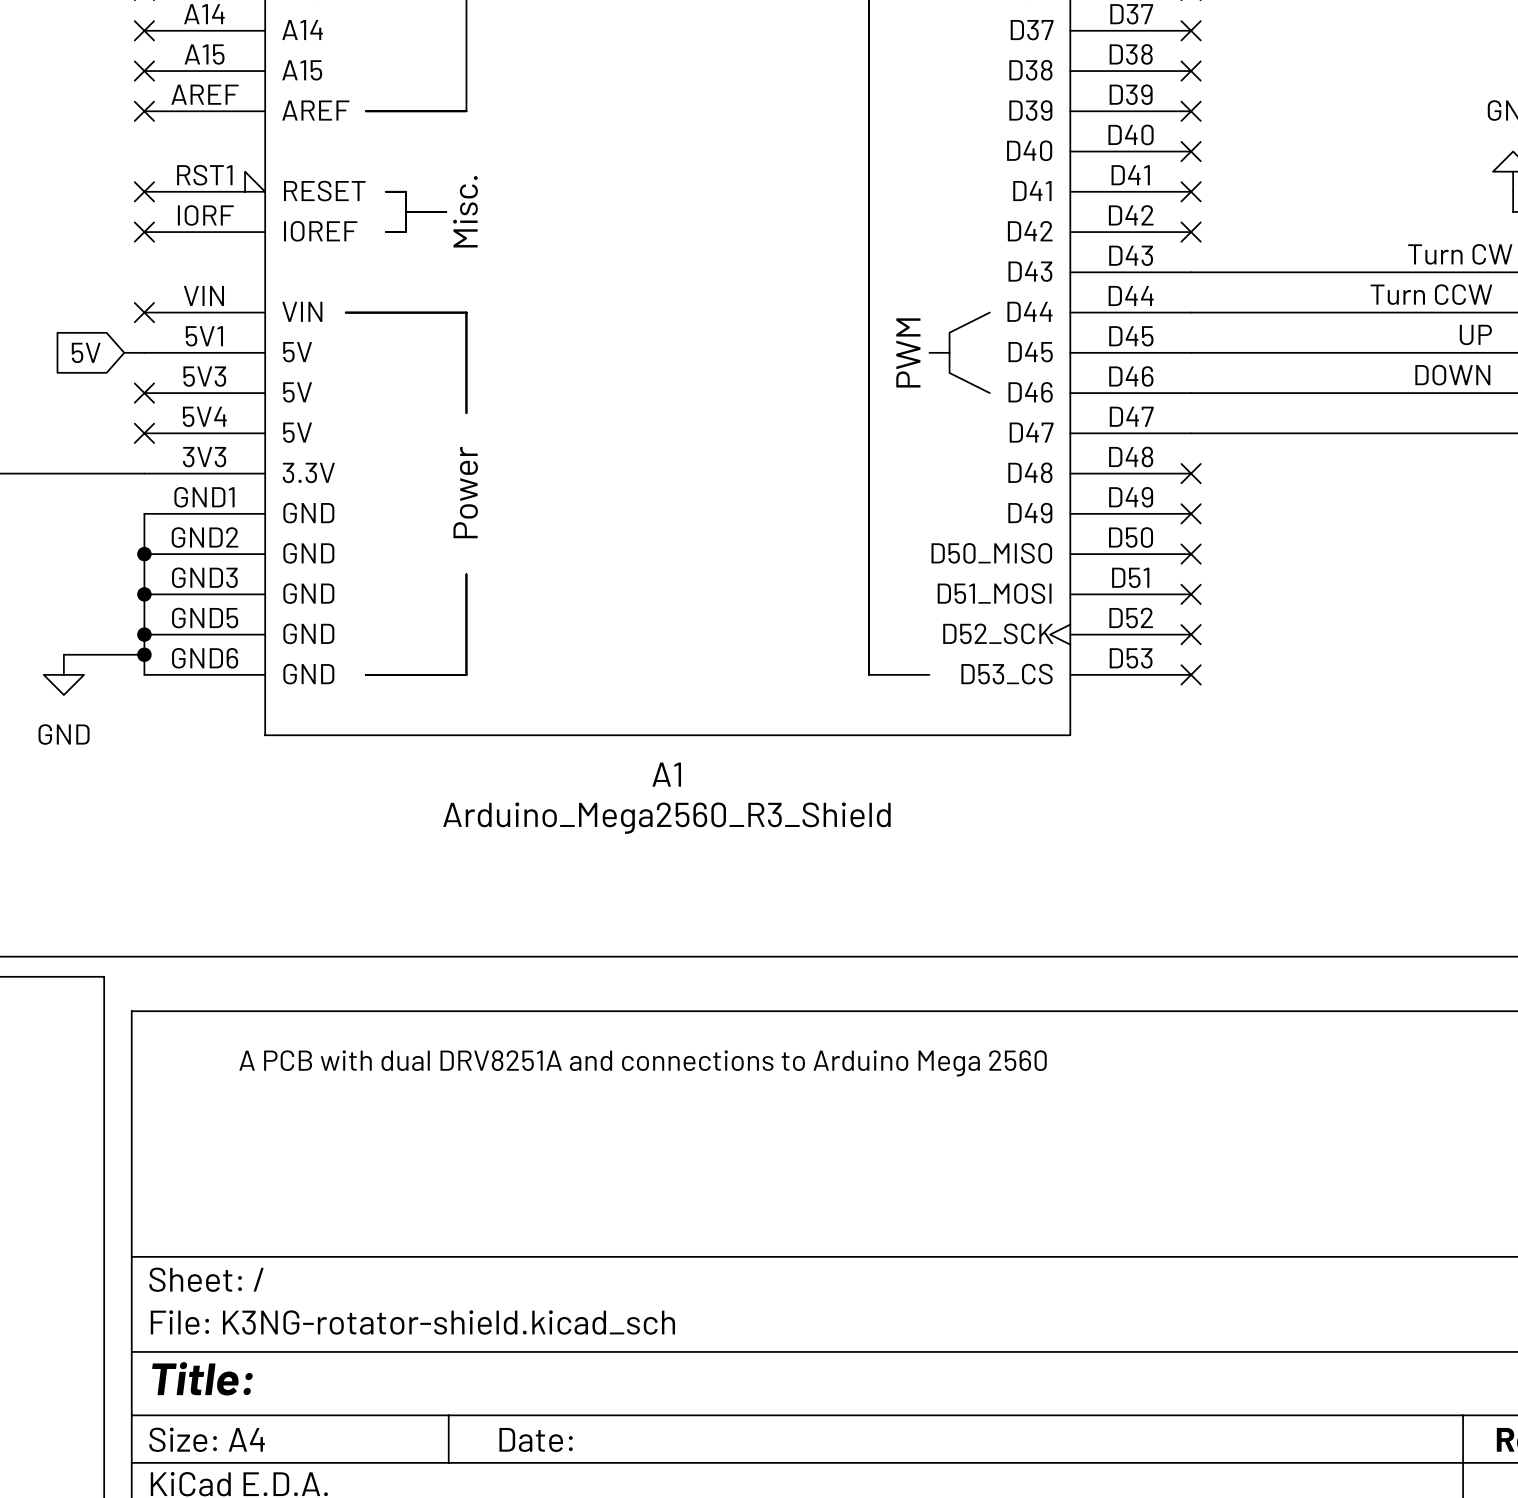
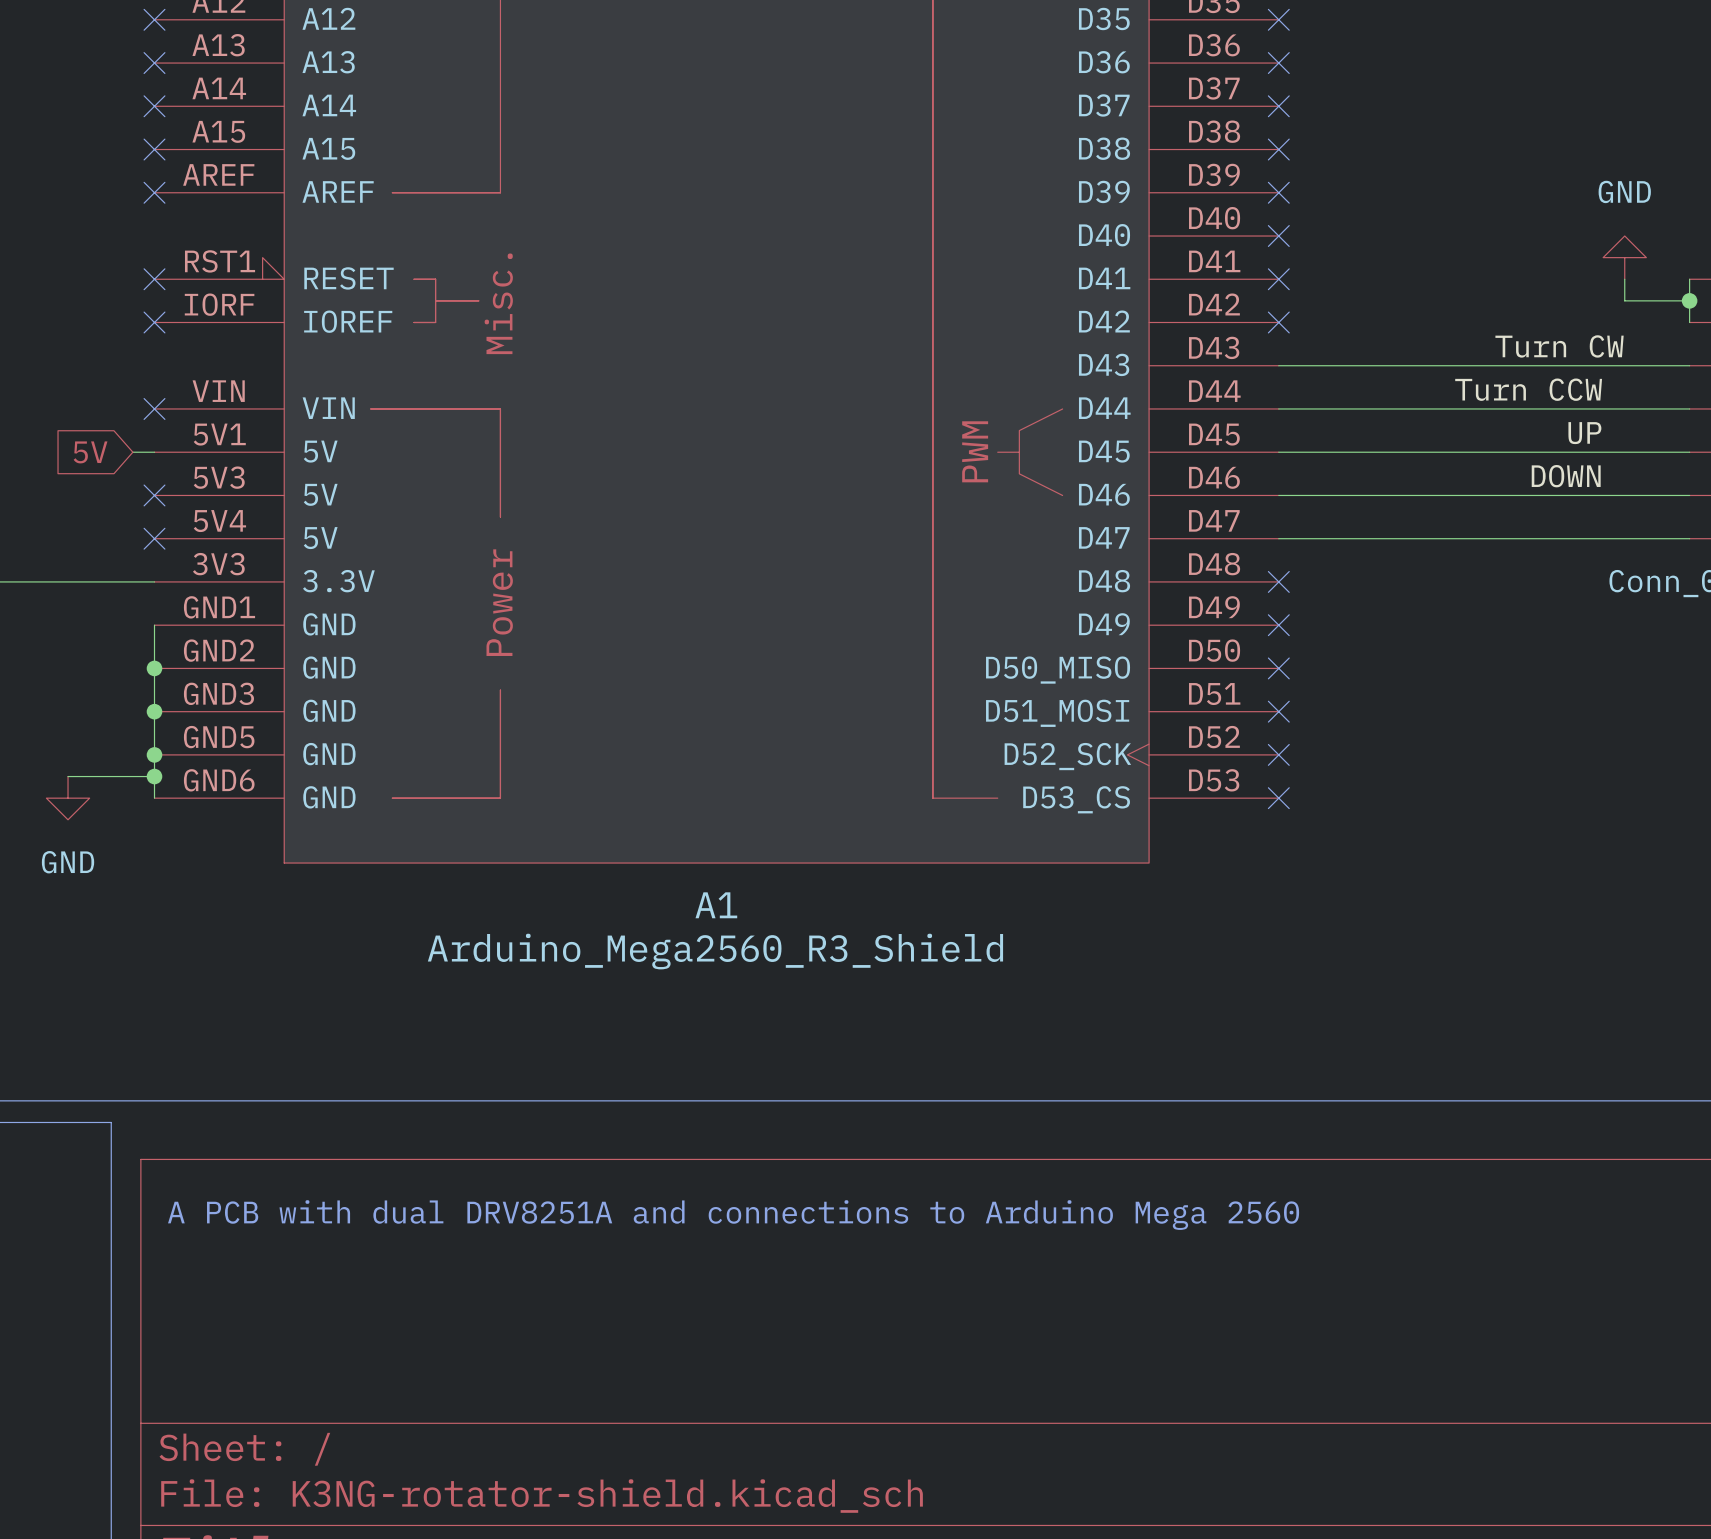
text position: A PCB with dual DRV8251A and connections to Arduino Mega 2560 (643, 1063) -> A PCB with dual DRV8251A and connections to Arduino Mega 2560 (733, 1215)

